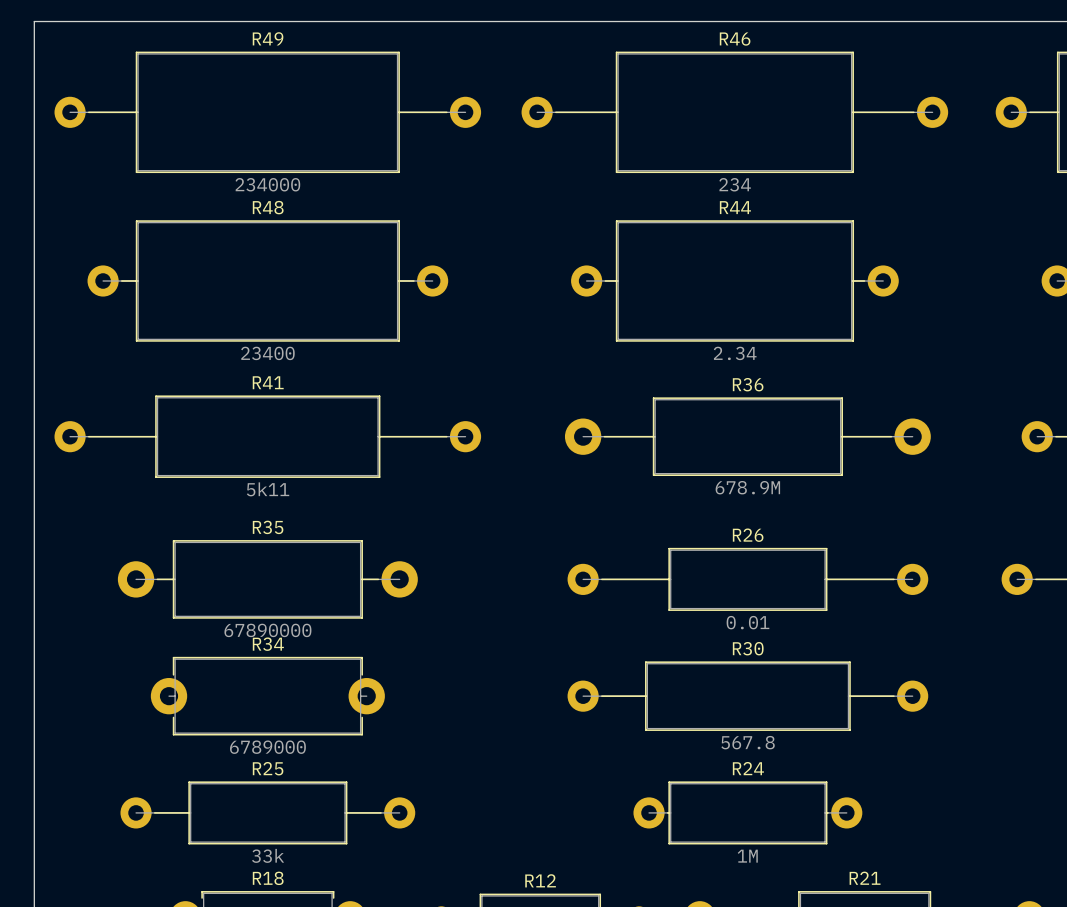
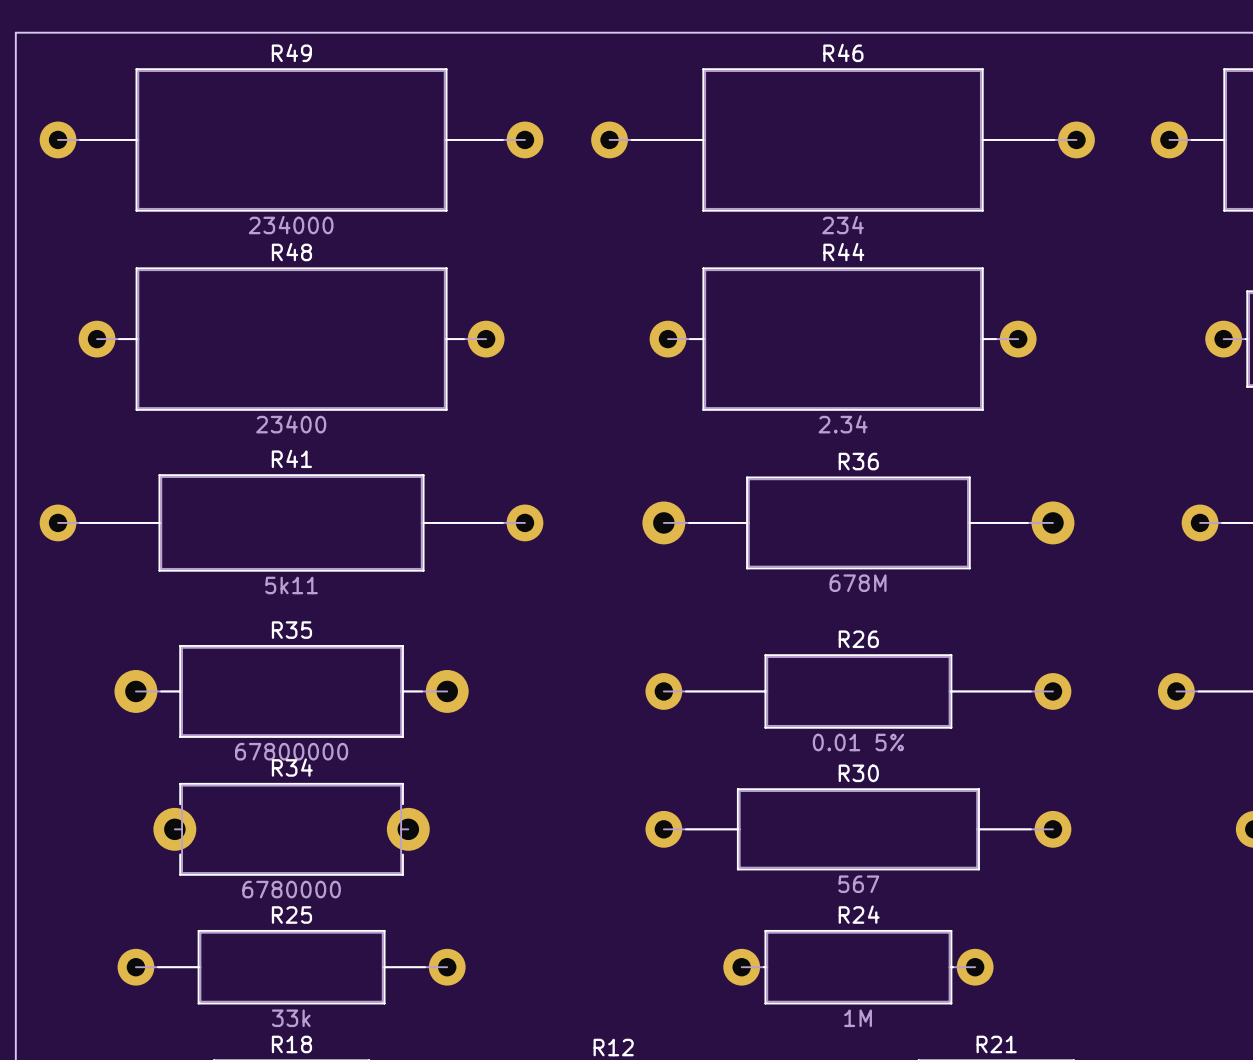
R36 value: 678.9M (747, 487) -> 678M (858, 583)
R26 value: 0.01 (747, 622) -> 0.01 5% (858, 742)
R35 value: 67890000 (267, 630) -> 67800000 (291, 751)
R30 value: 567.8 (748, 742) -> 567 (858, 884)
R34 value: 6789000 (267, 747) -> 6780000 (291, 889)

